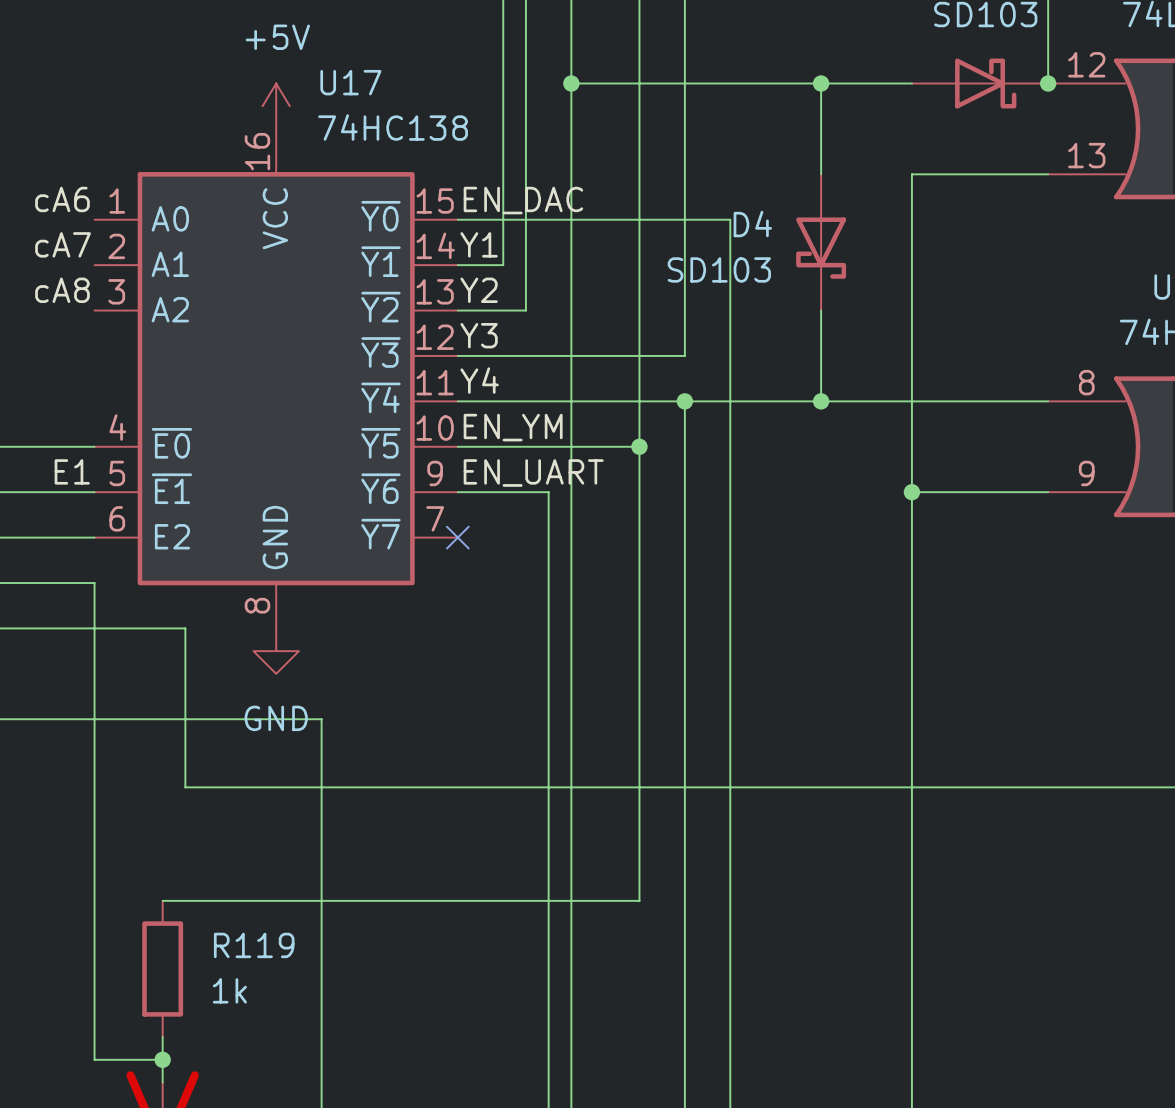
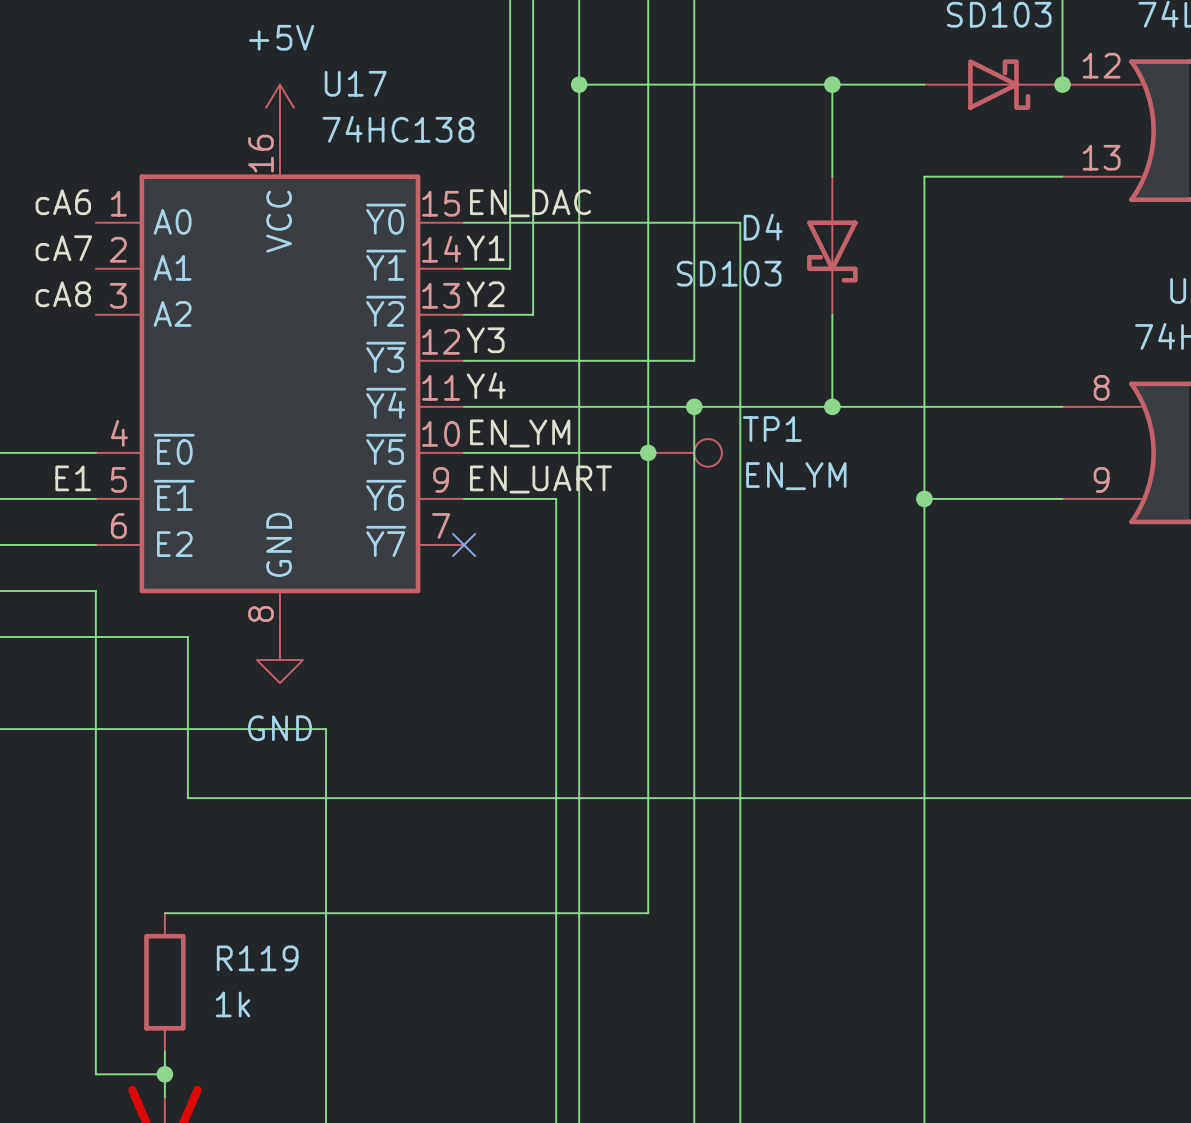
TP1: none -> EN_YM (685, 452)

